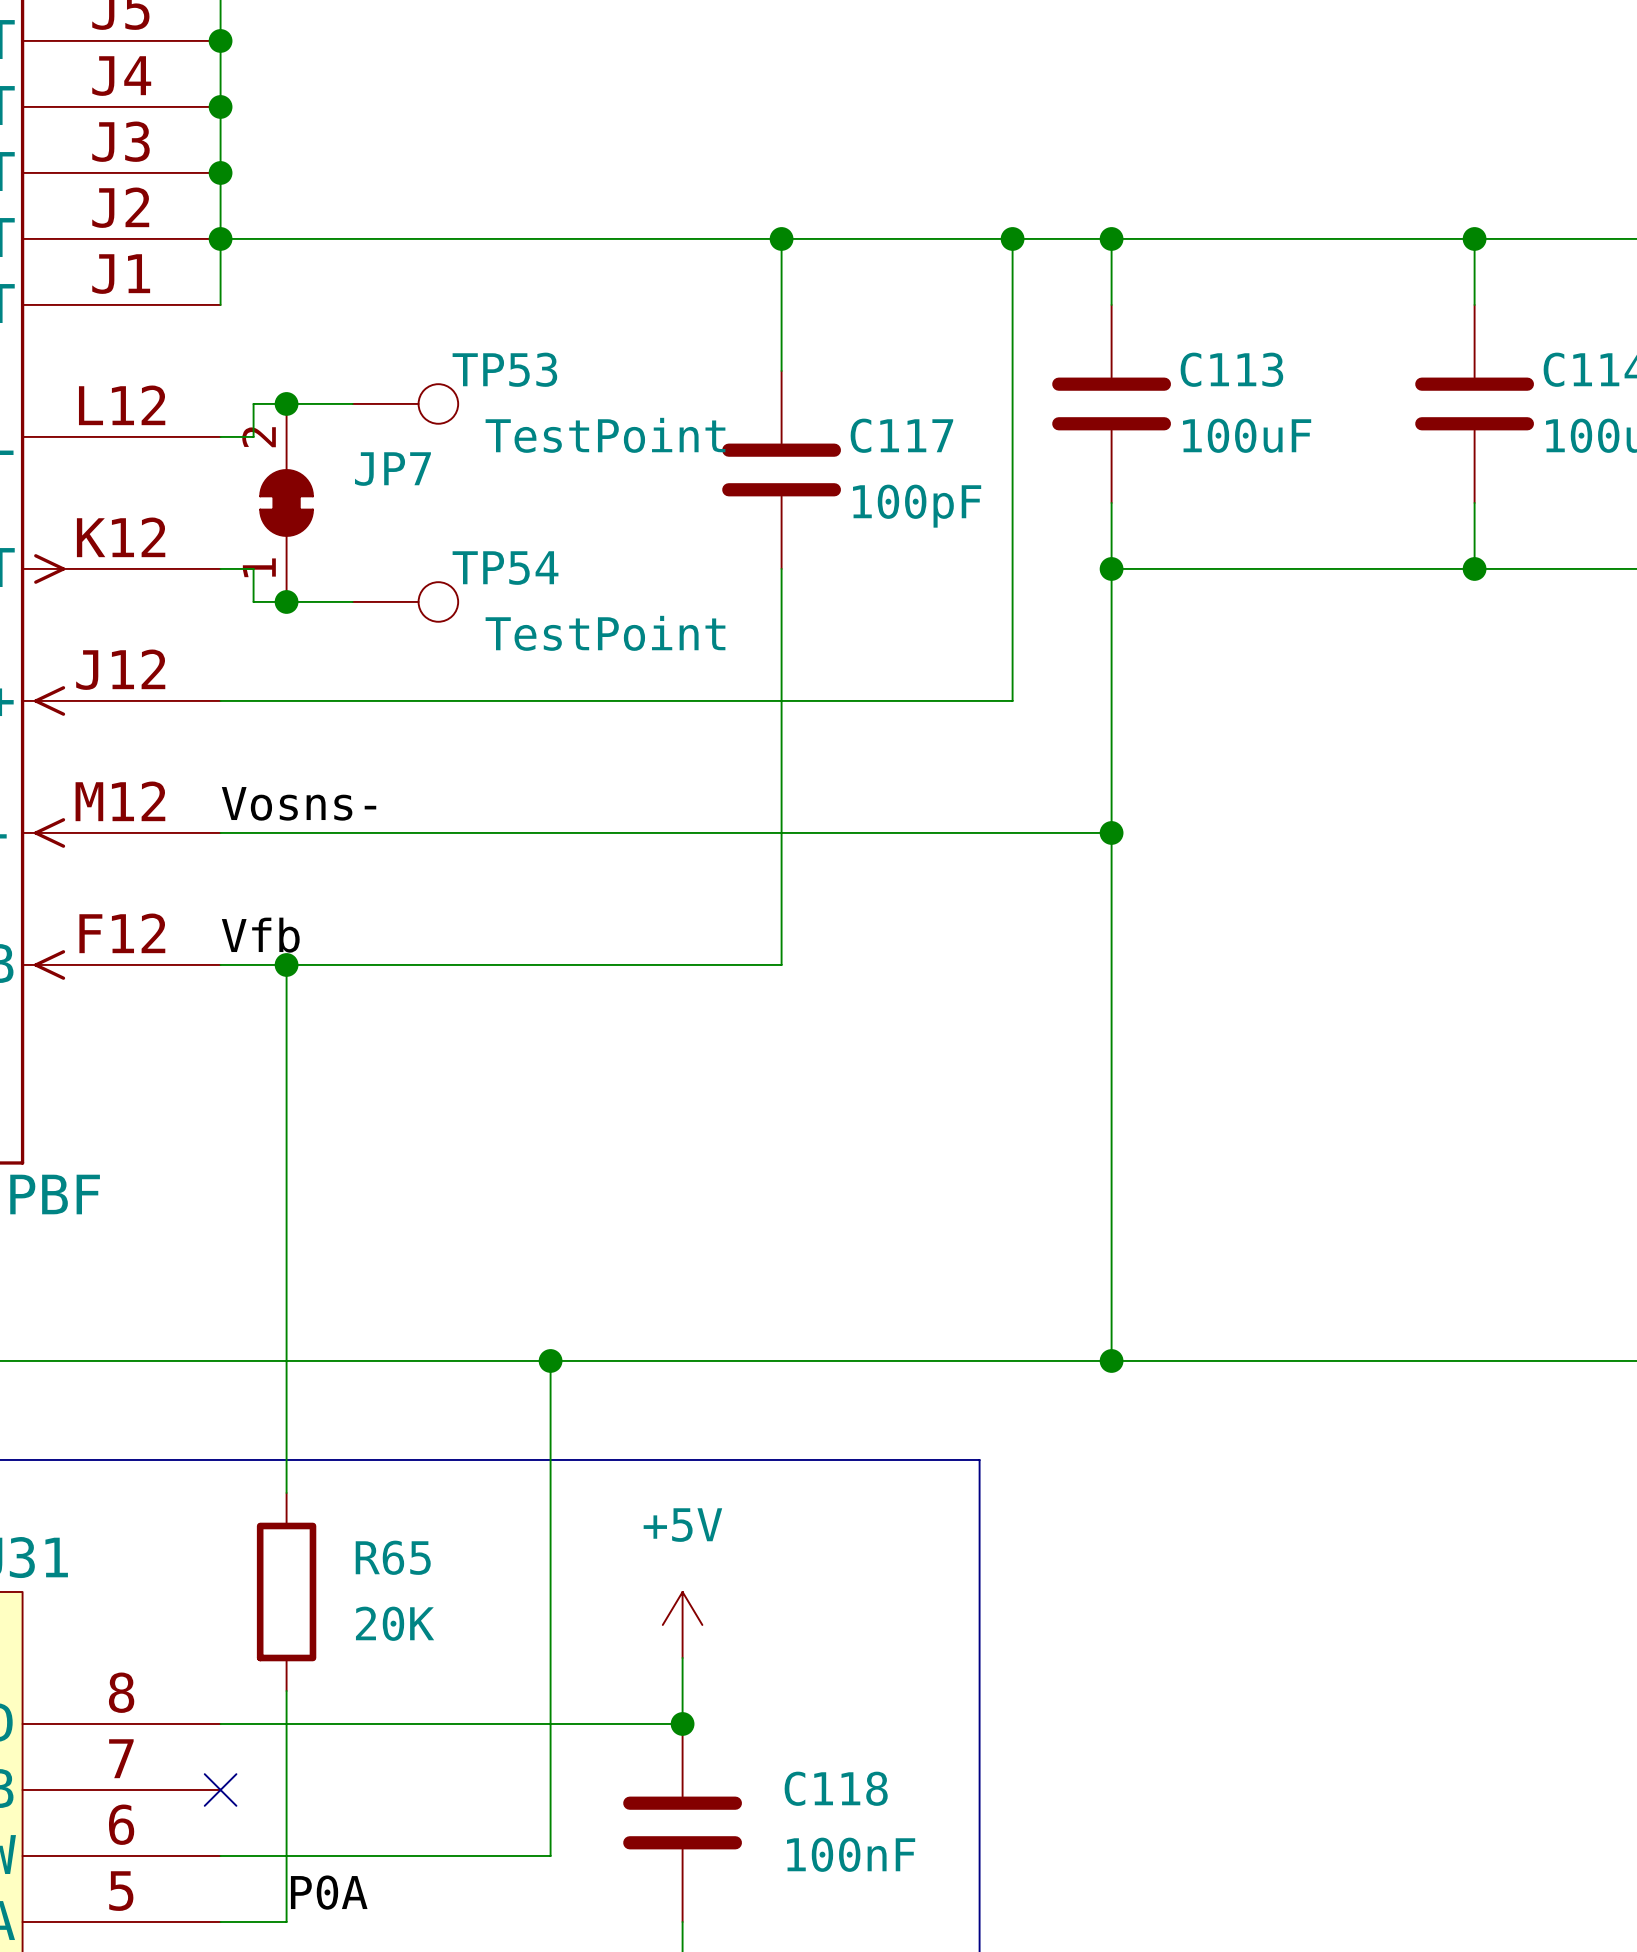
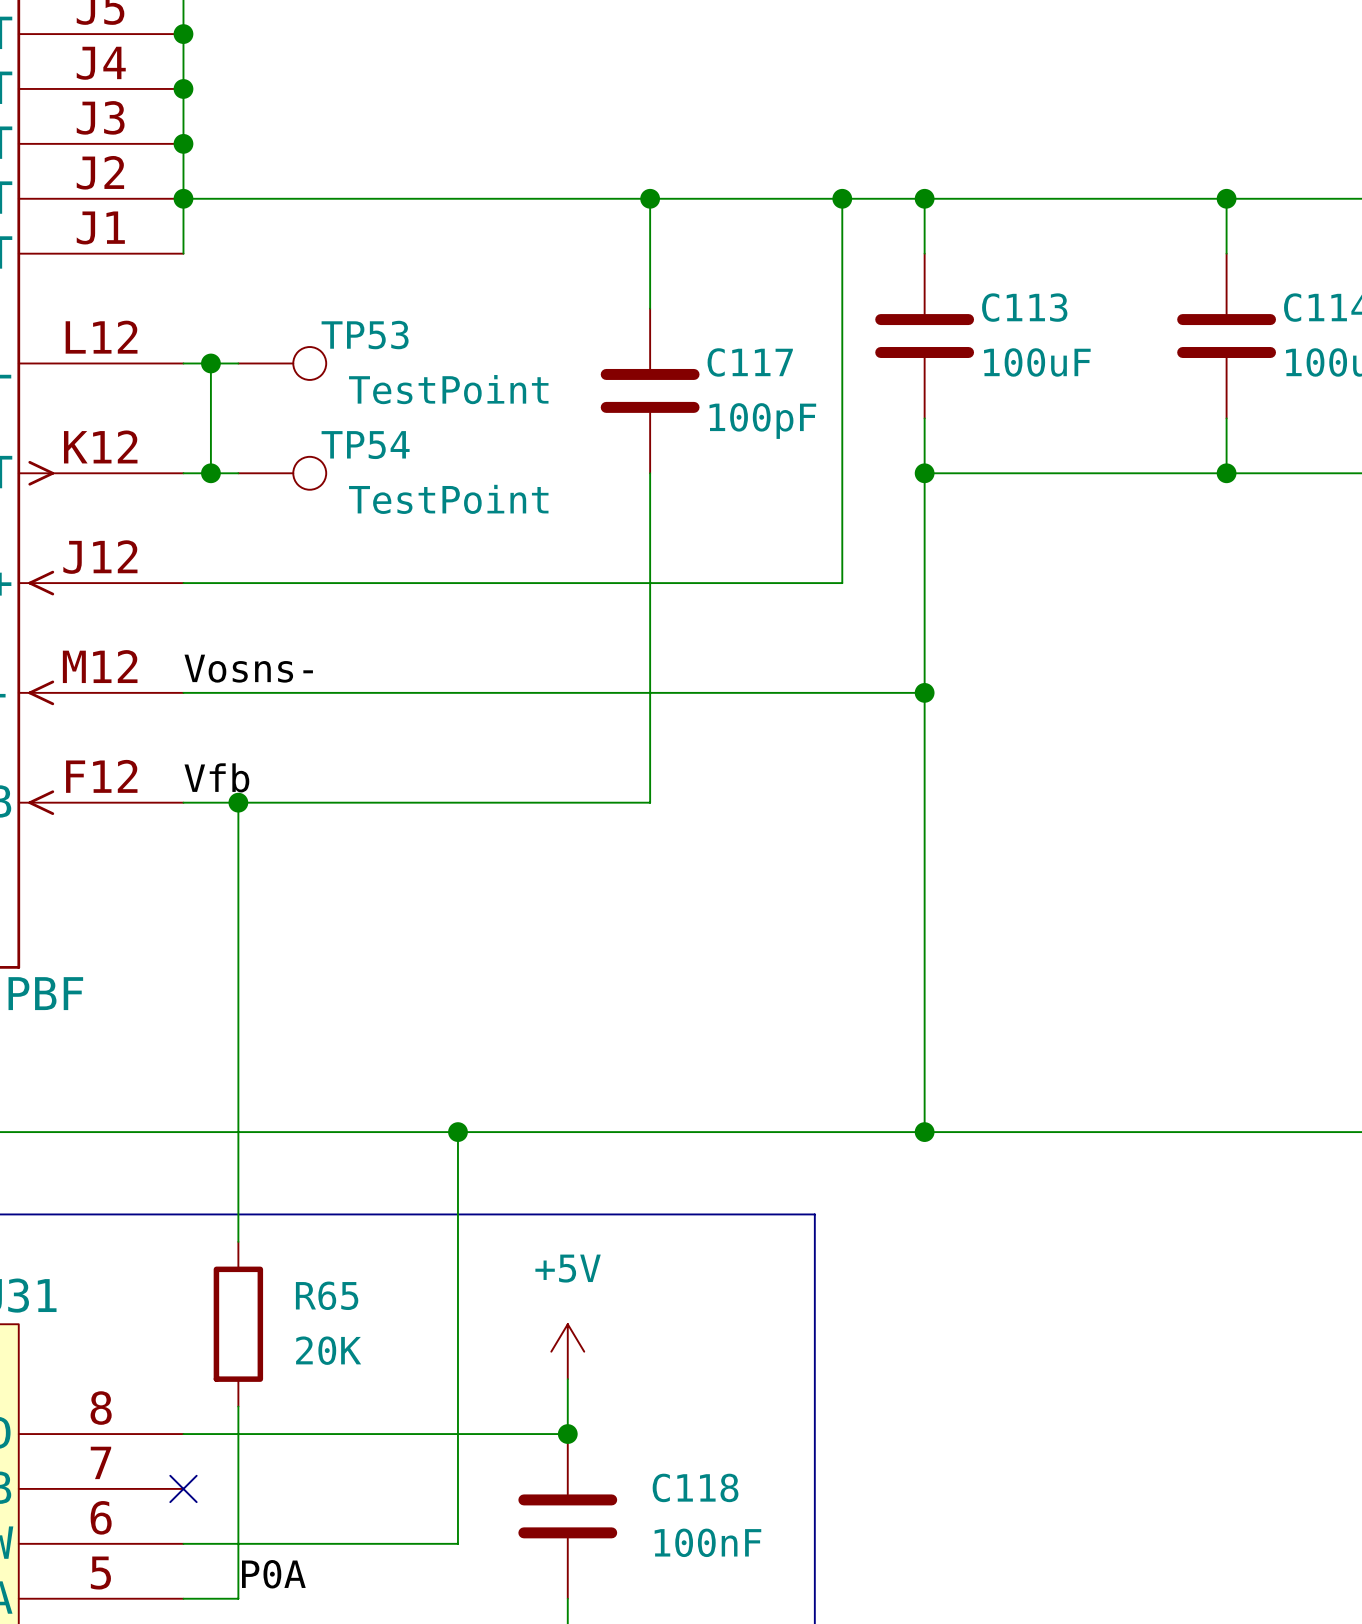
junction position: (286, 403) -> (210, 363)
wire: (352, 403) (253, 403) (253, 436) -> none
TP53 position: (405, 403) -> (282, 363)
wire: none -> (238, 363) (210, 363) (210, 473) (238, 473)
JP7: (286, 502) -> none
wire: (253, 568) (253, 601) (352, 601) -> none
junction position: (286, 601) -> (210, 473)
TP54 position: (405, 601) -> (282, 473)

